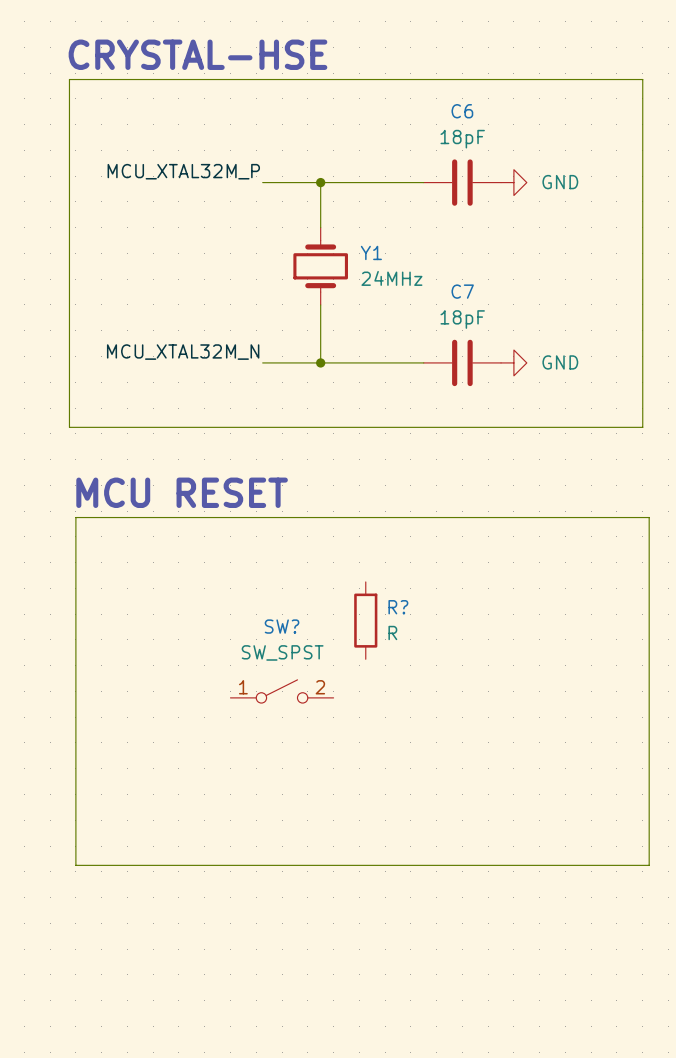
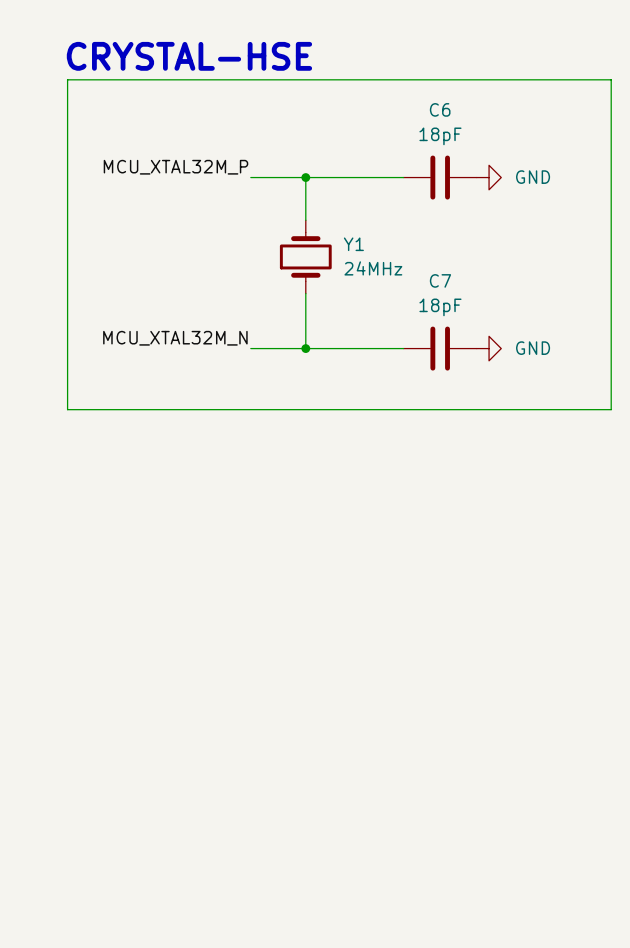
text: MCU RESET (182, 492) -> none
wire: (75, 517) (649, 517) (649, 865) (75, 865) (75, 517) -> none
R?: R (365, 620) -> none
SW?: SW_SPST (282, 691) -> none

